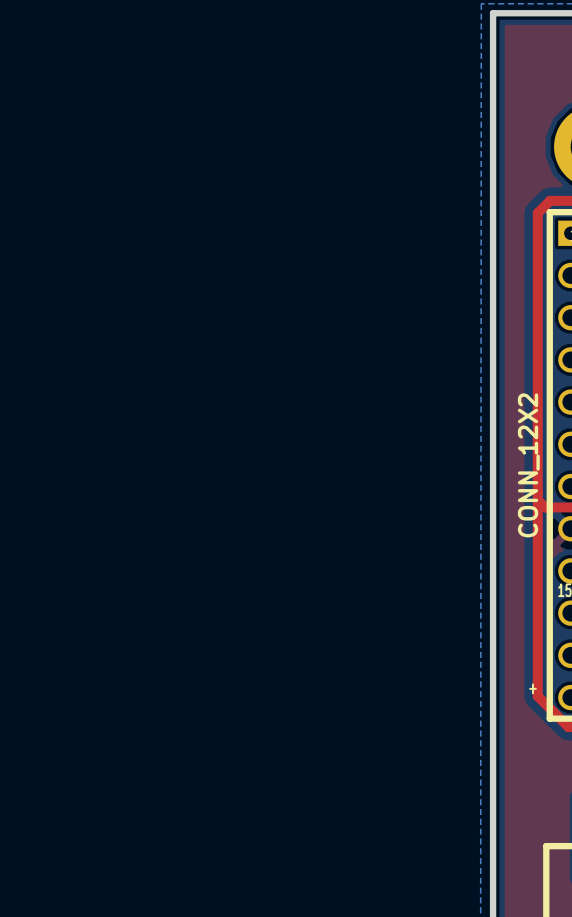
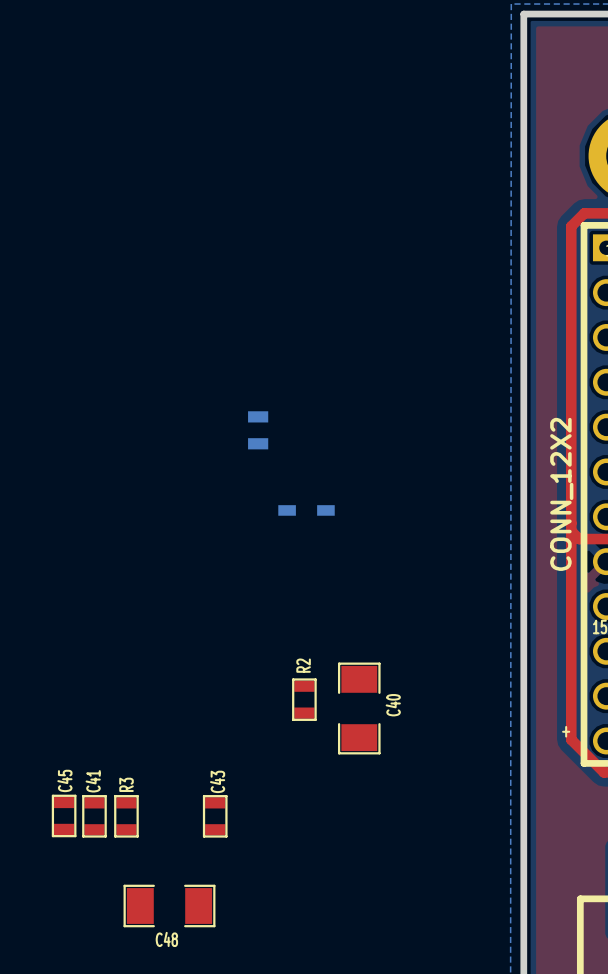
part: none -> (258, 430)
part: none -> (306, 510)
R2: none -> (304, 699)
C40: none -> (359, 708)
C45: none -> (64, 815)
C41: none -> (94, 816)
R3: none -> (126, 816)
C43: none -> (215, 816)
C48: none -> (169, 906)

